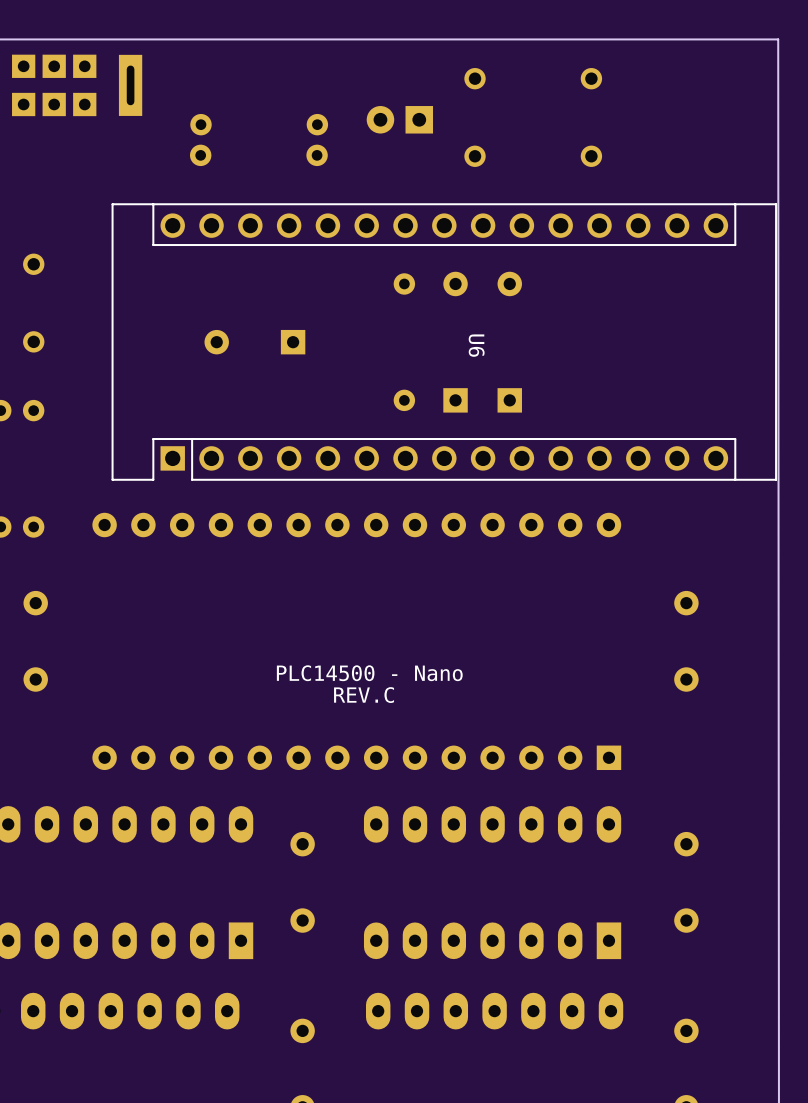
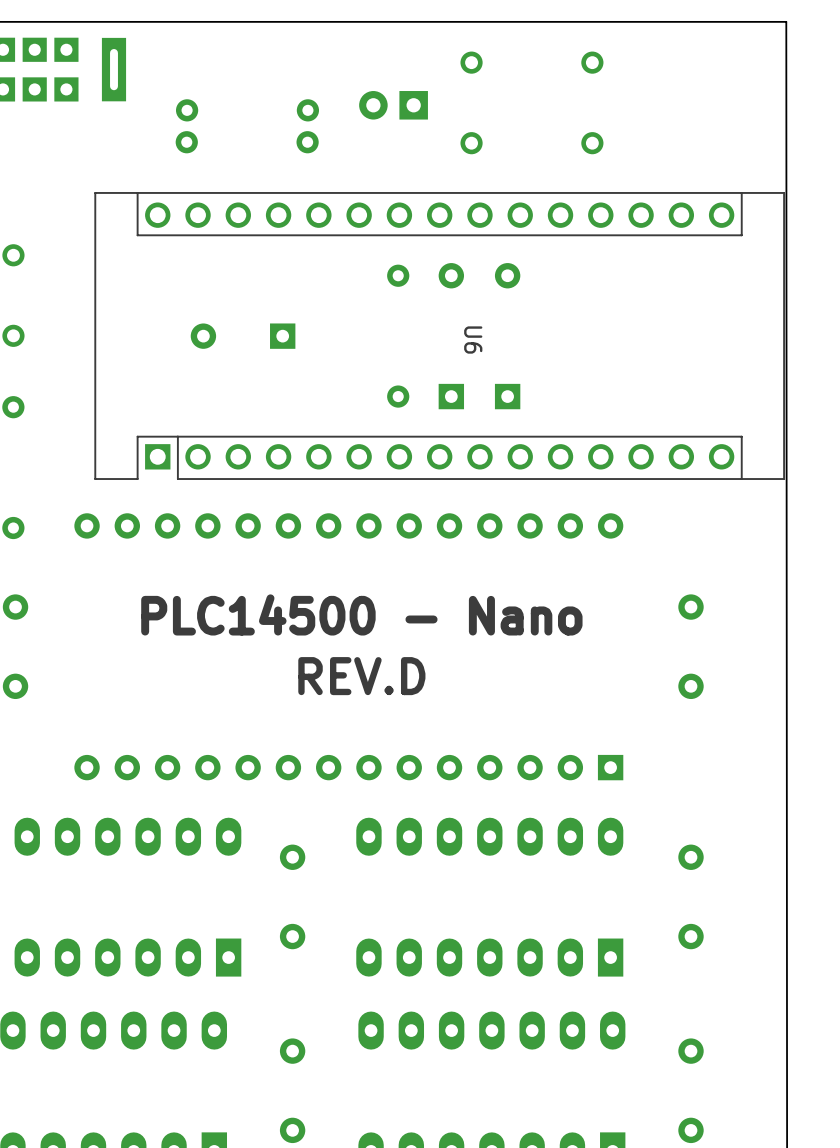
text: none -> PLC14500 - Nano (361, 614)
text: PLC14500 - Nano (369, 673) -> REV.D (361, 676)
text: REV.C (364, 695) -> none

